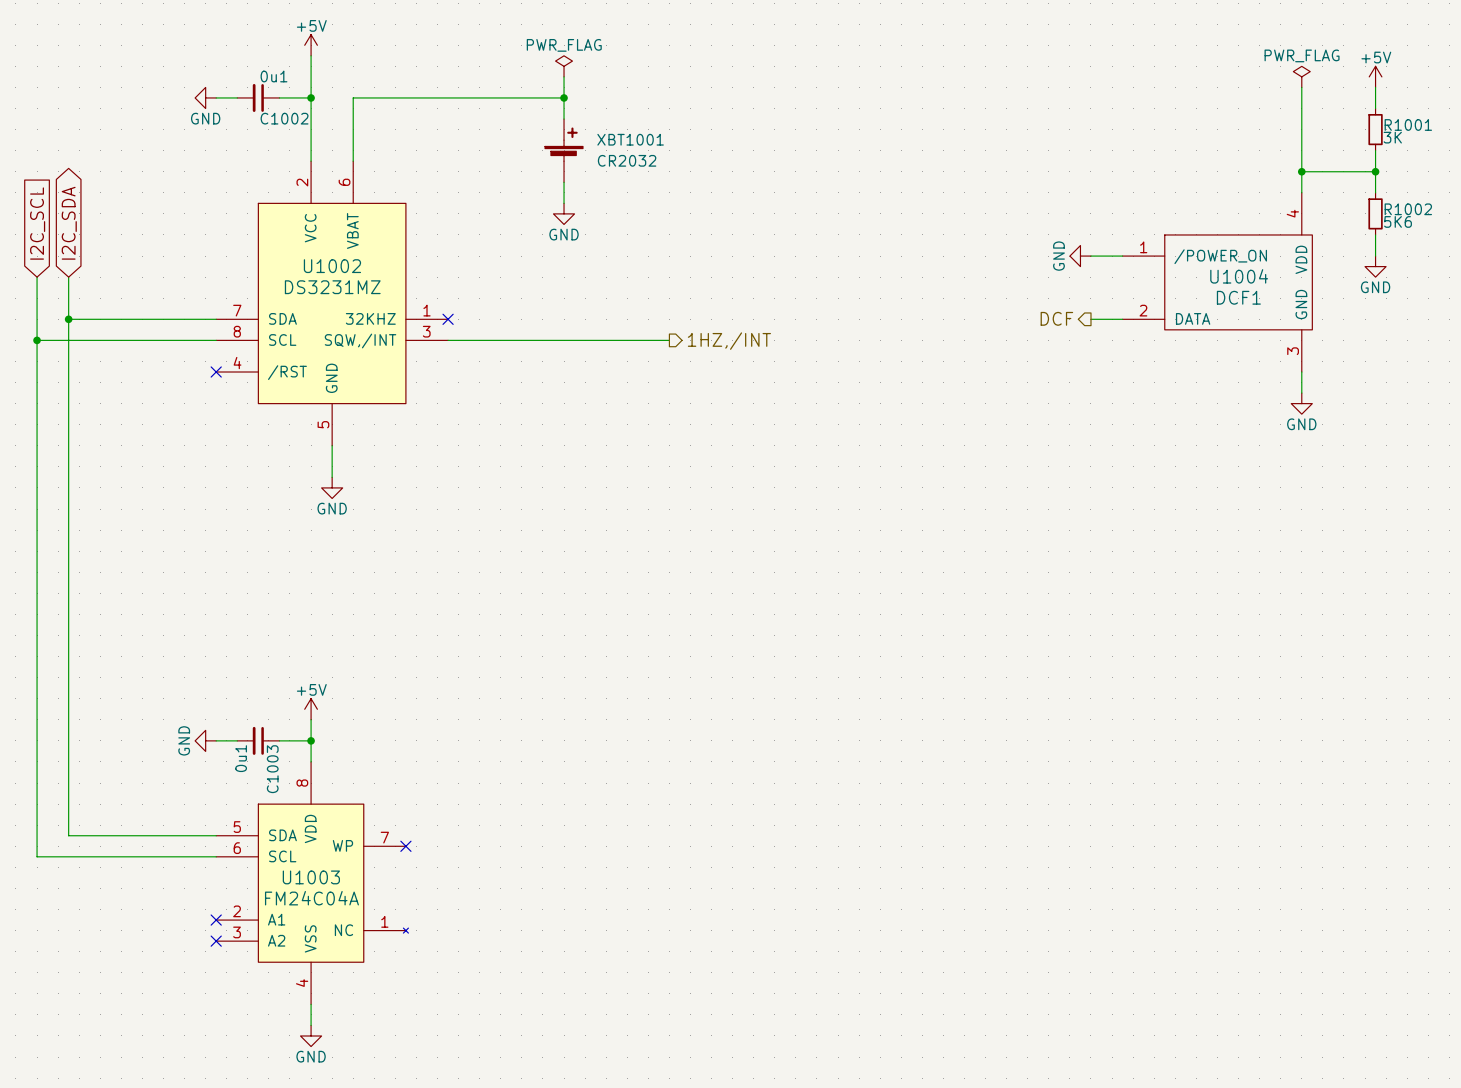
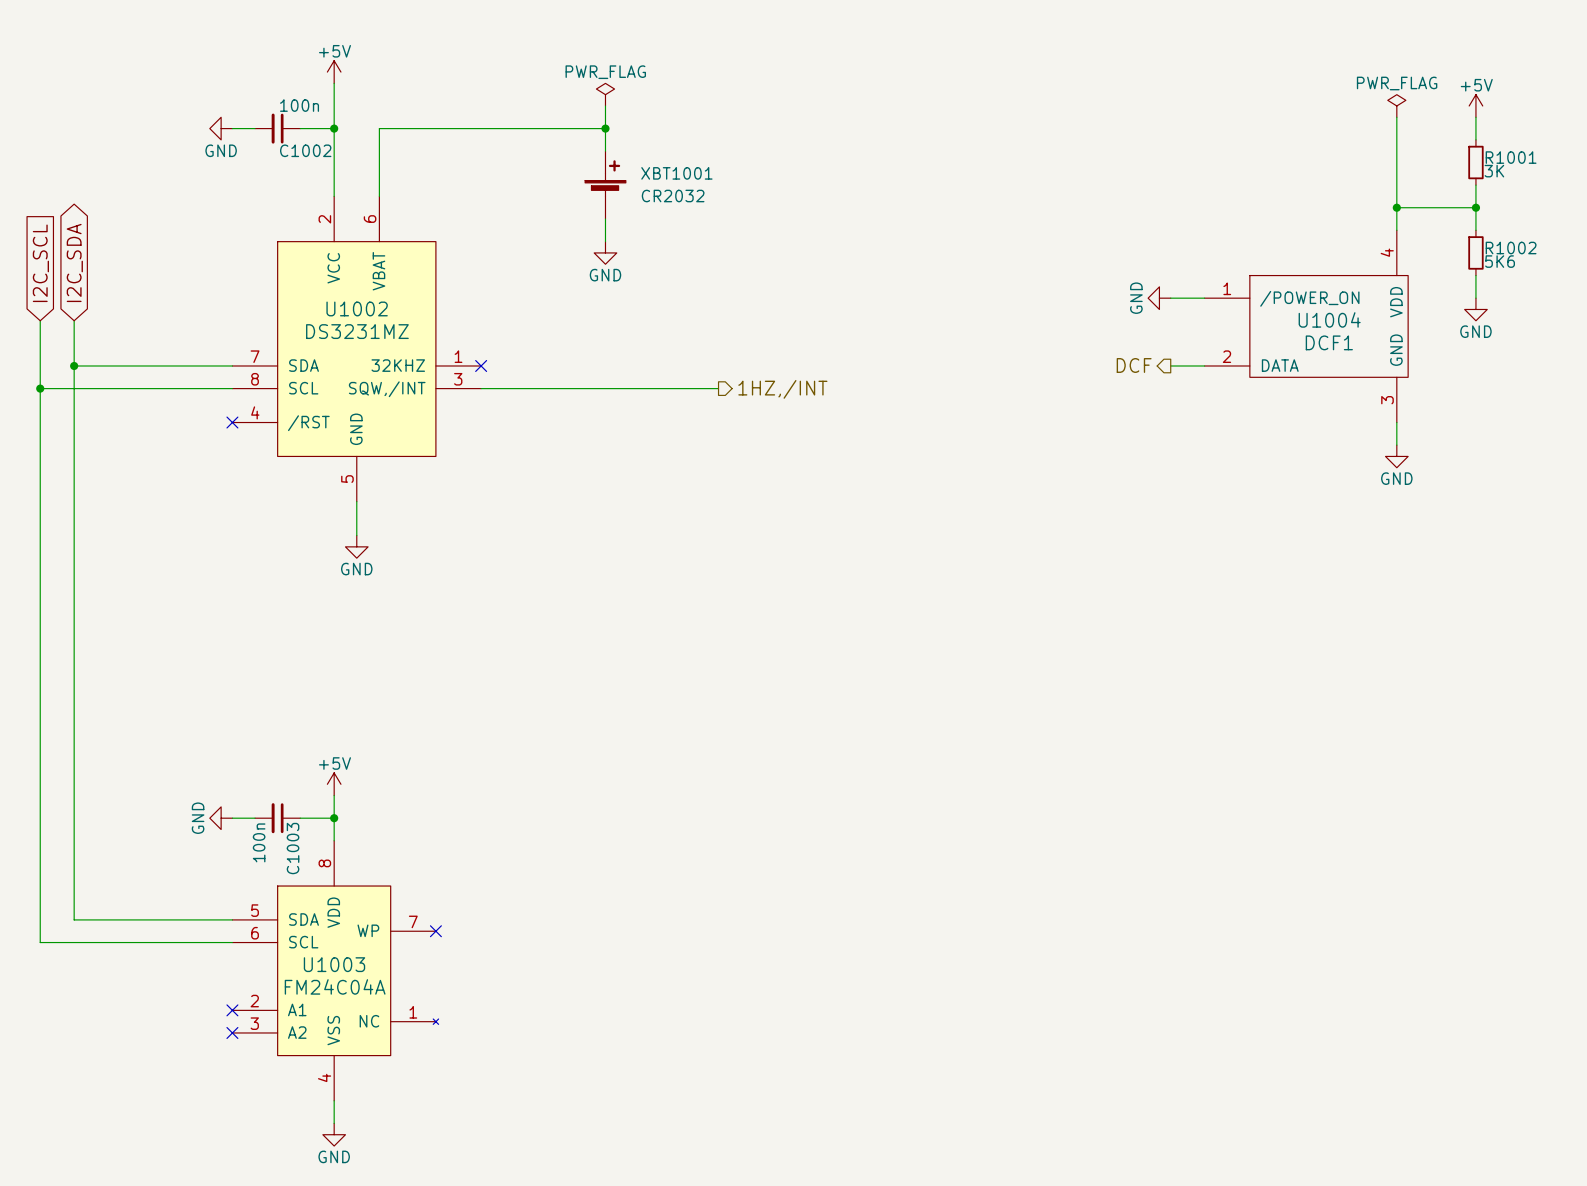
C1002 value: 0u1 (274, 76) -> 100n (299, 105)
C1003 value: 0u1 (241, 758) -> 100n (259, 842)

